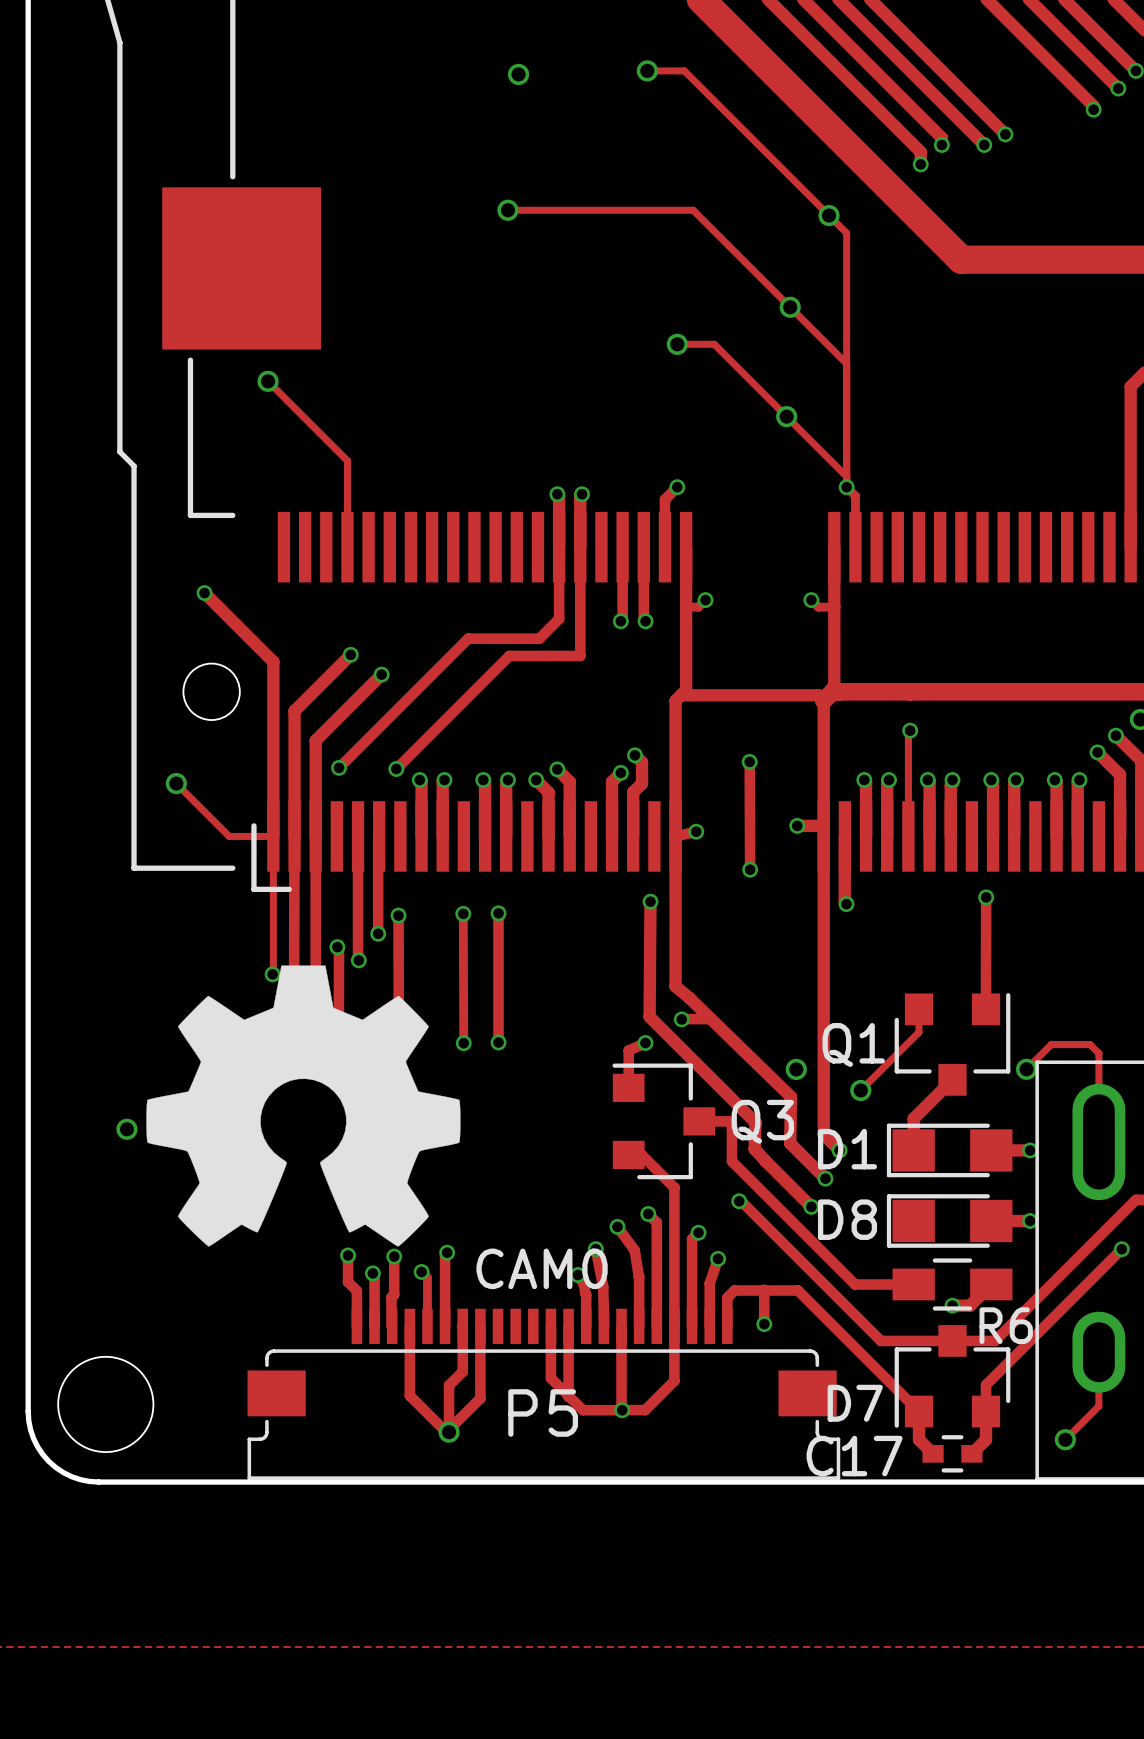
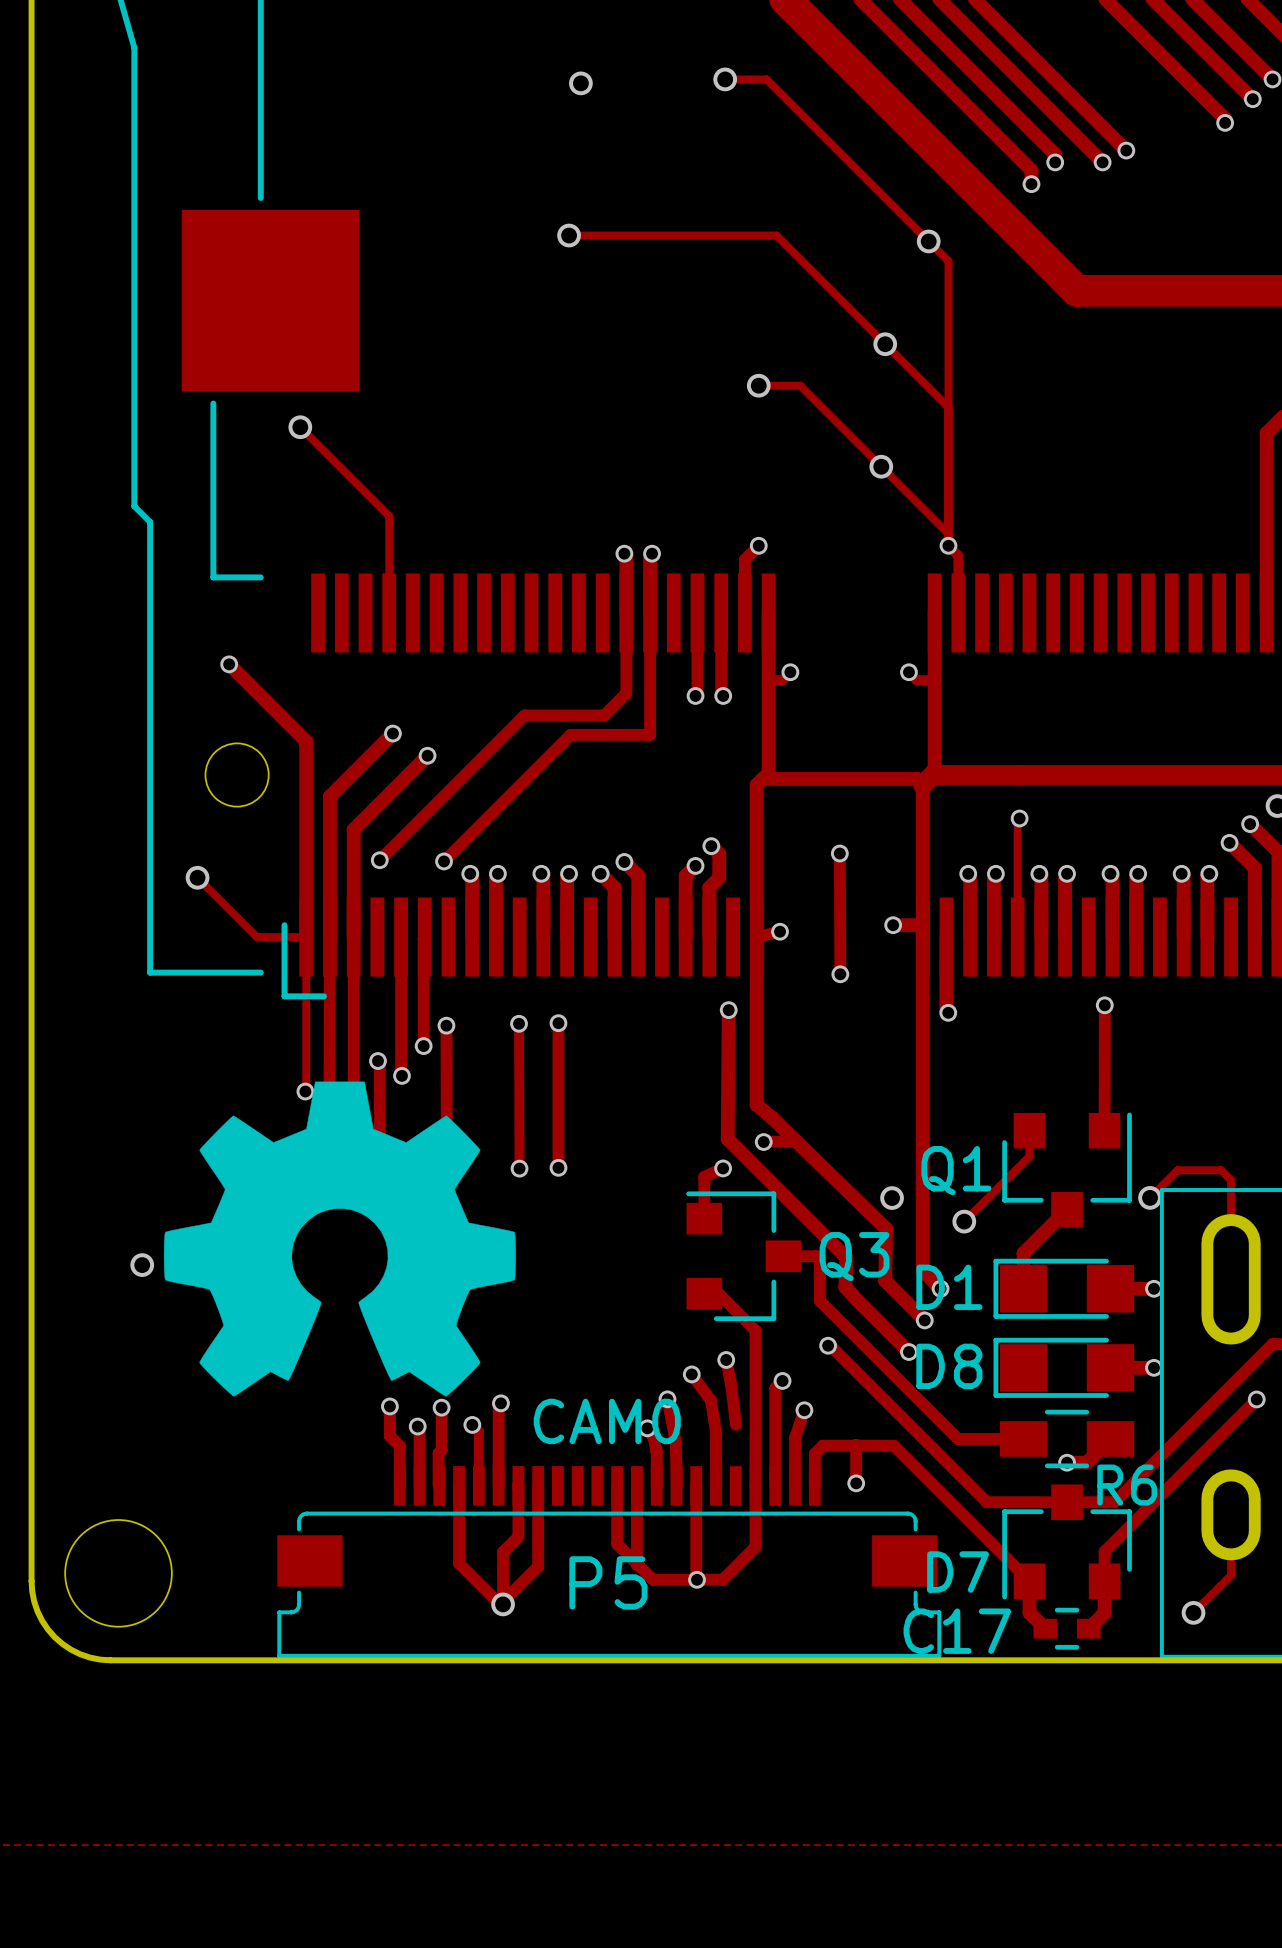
track: (648, 1213) (656, 1222) (656, 1326) -> (726, 1359) (735, 1424)

